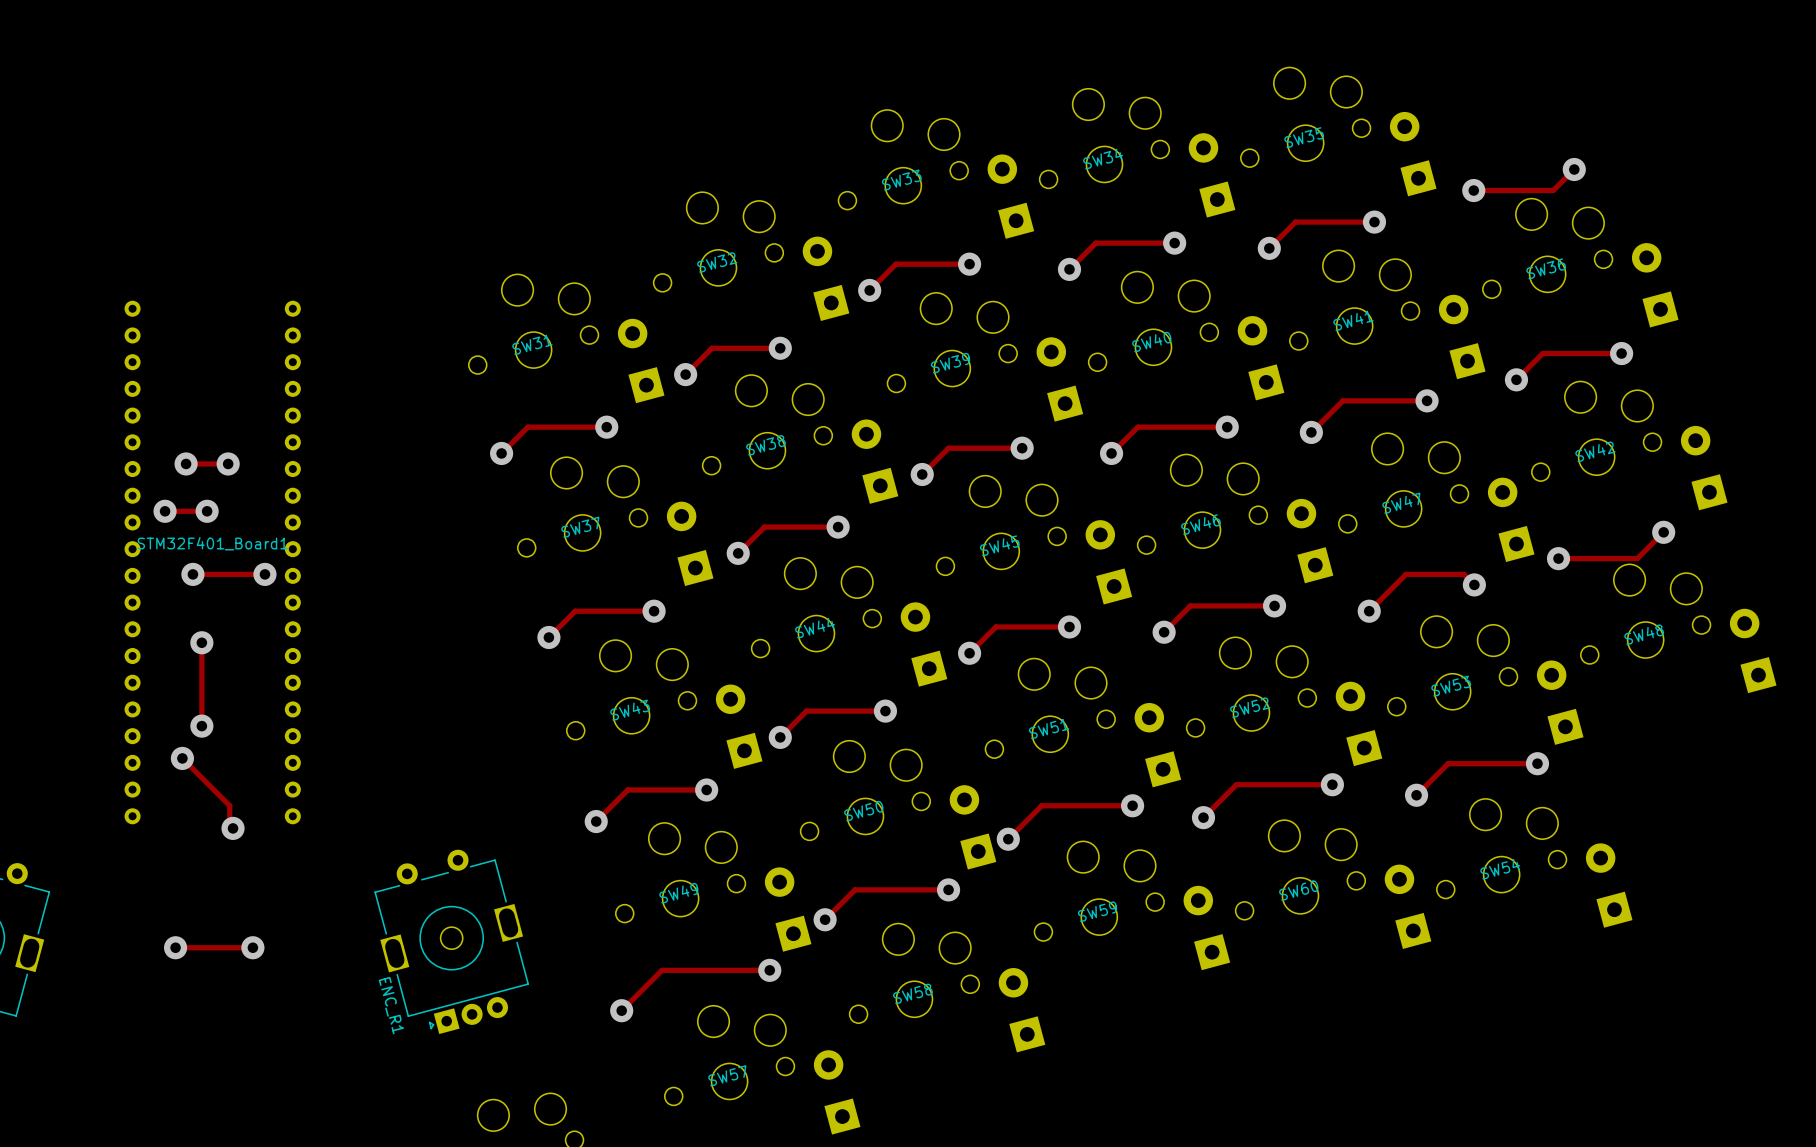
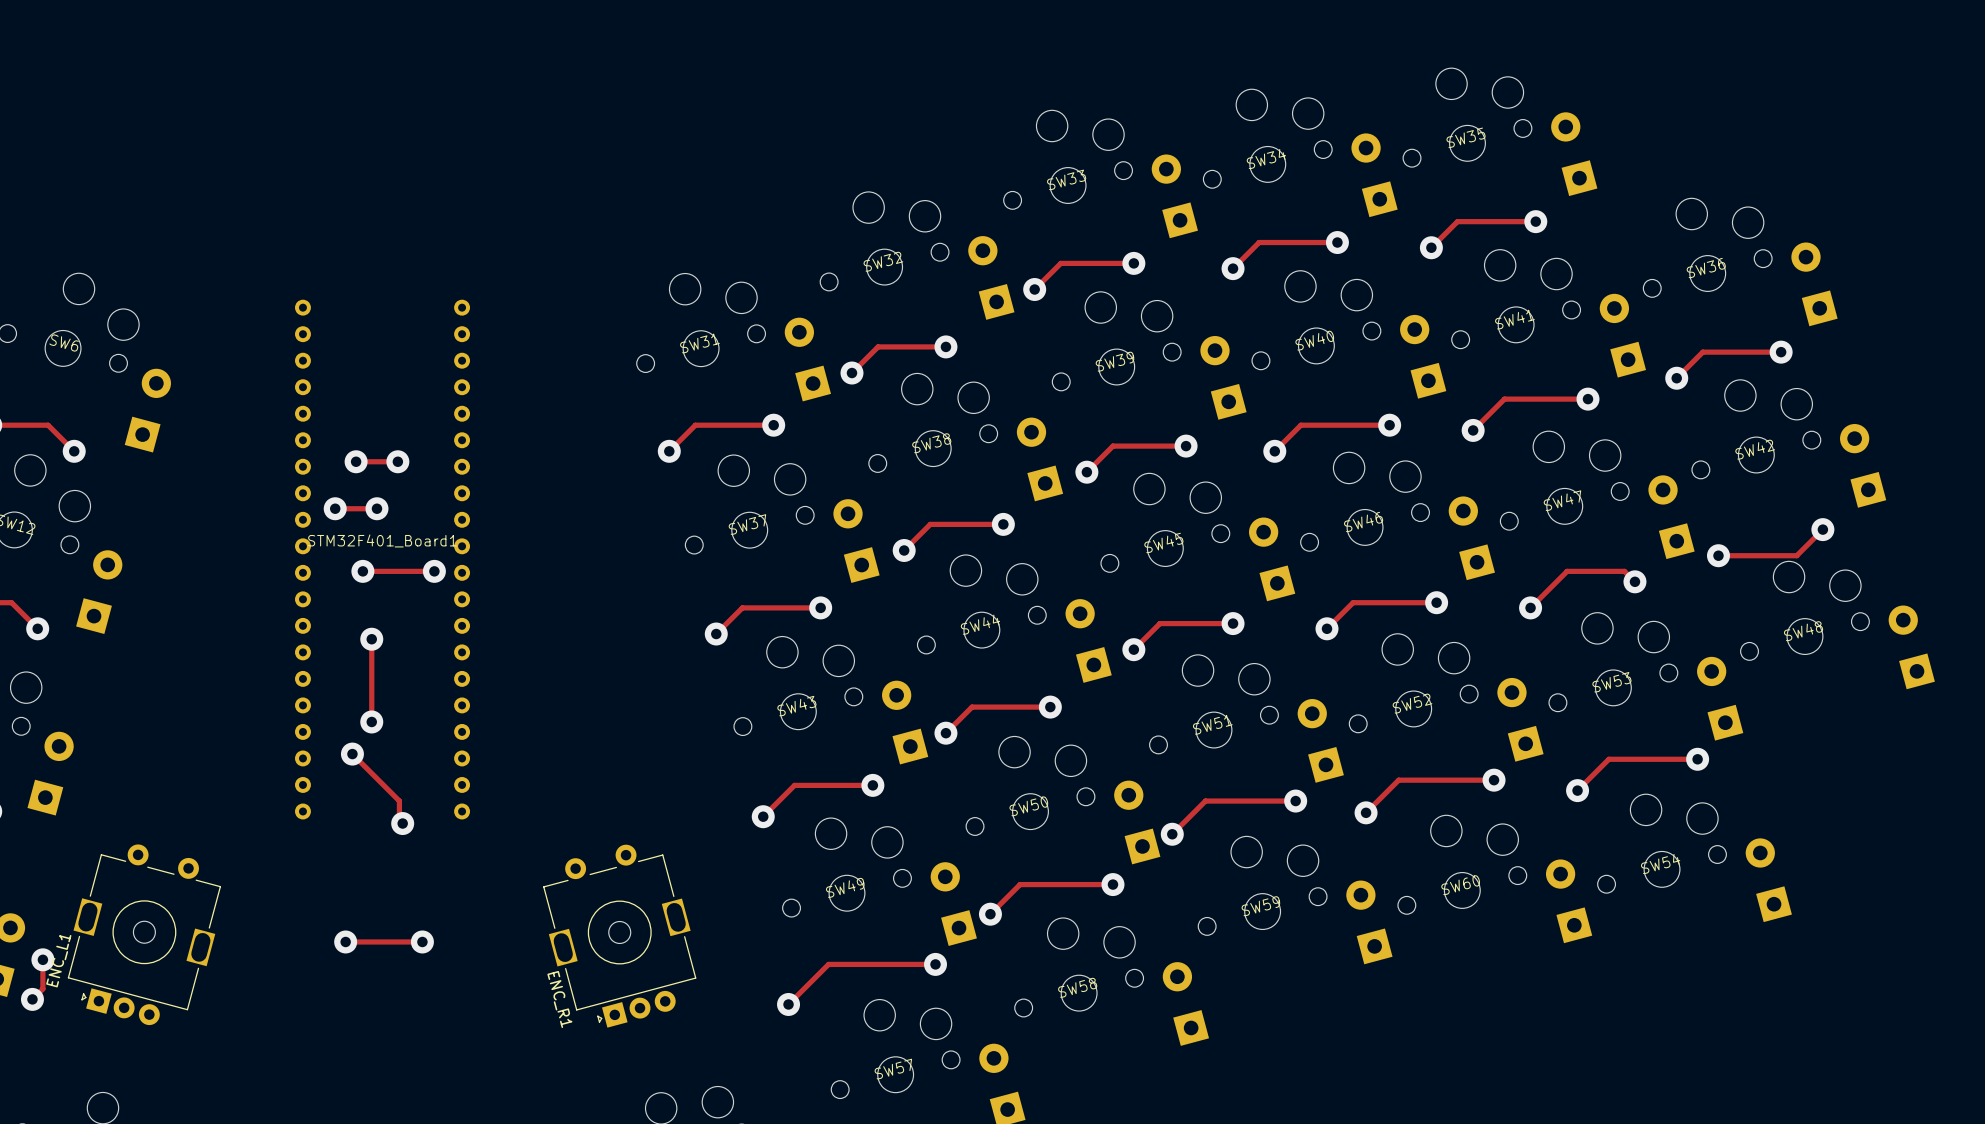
track: (1574, 169) (1553, 190) (1473, 190) -> none
via: (1574, 169) -> none
via: (1473, 190) -> none

